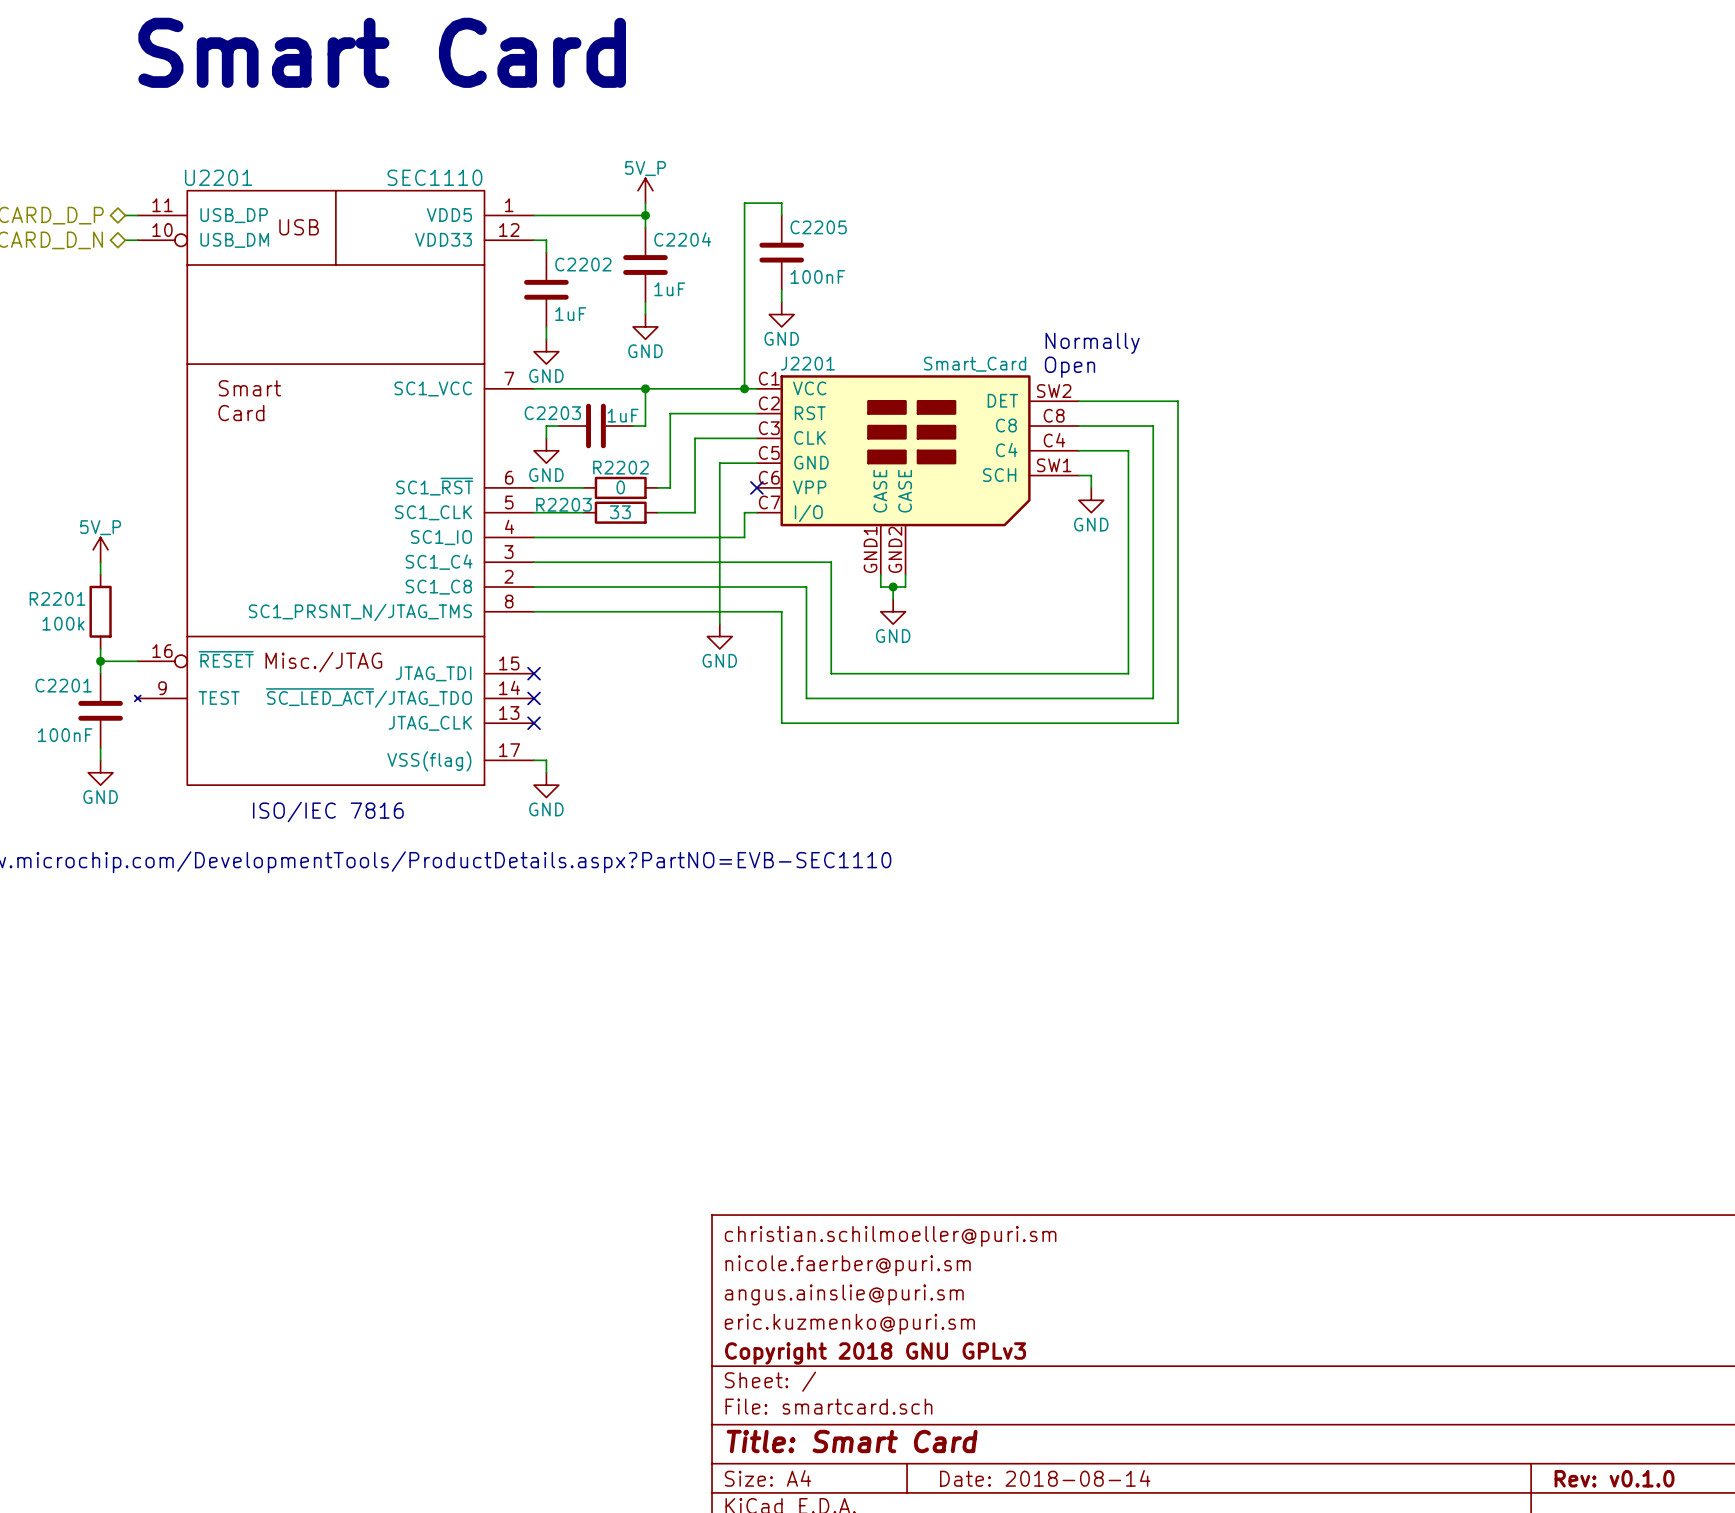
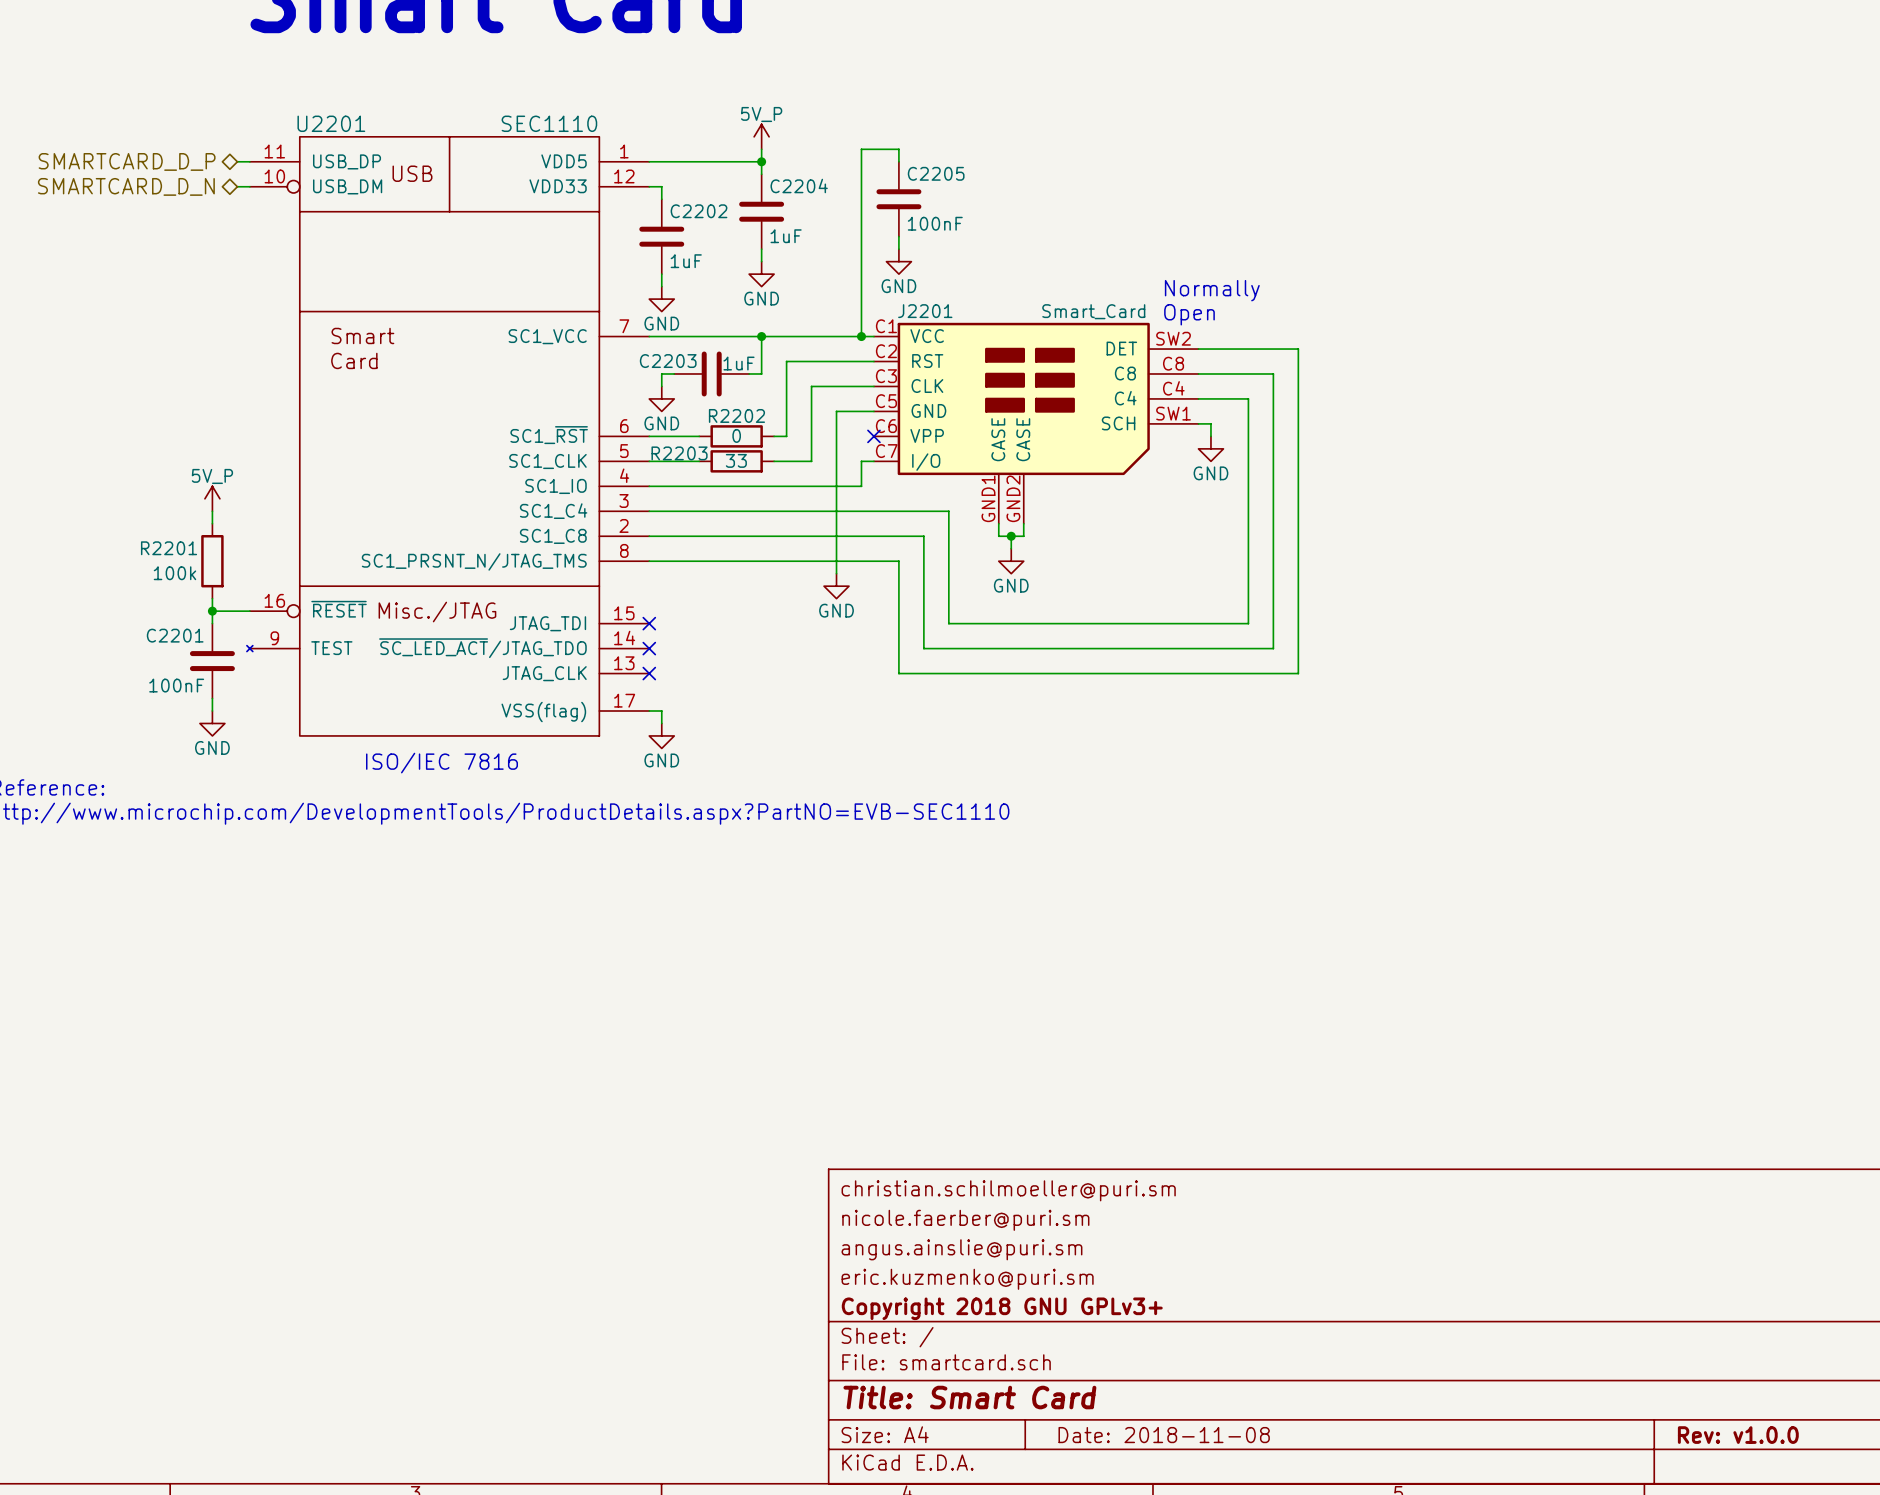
title block: Copyright 2018 GNU GPLv3 (875, 1353) -> Copyright 2018 GNU GPLv3+ (1002, 1308)
title block: Date: 2018-08-14 (1045, 1478) -> Date: 2018-11-08 (1164, 1435)
title block: Rev: v0.1.0 (1614, 1478) -> Rev: v1.0.0 (1738, 1435)

